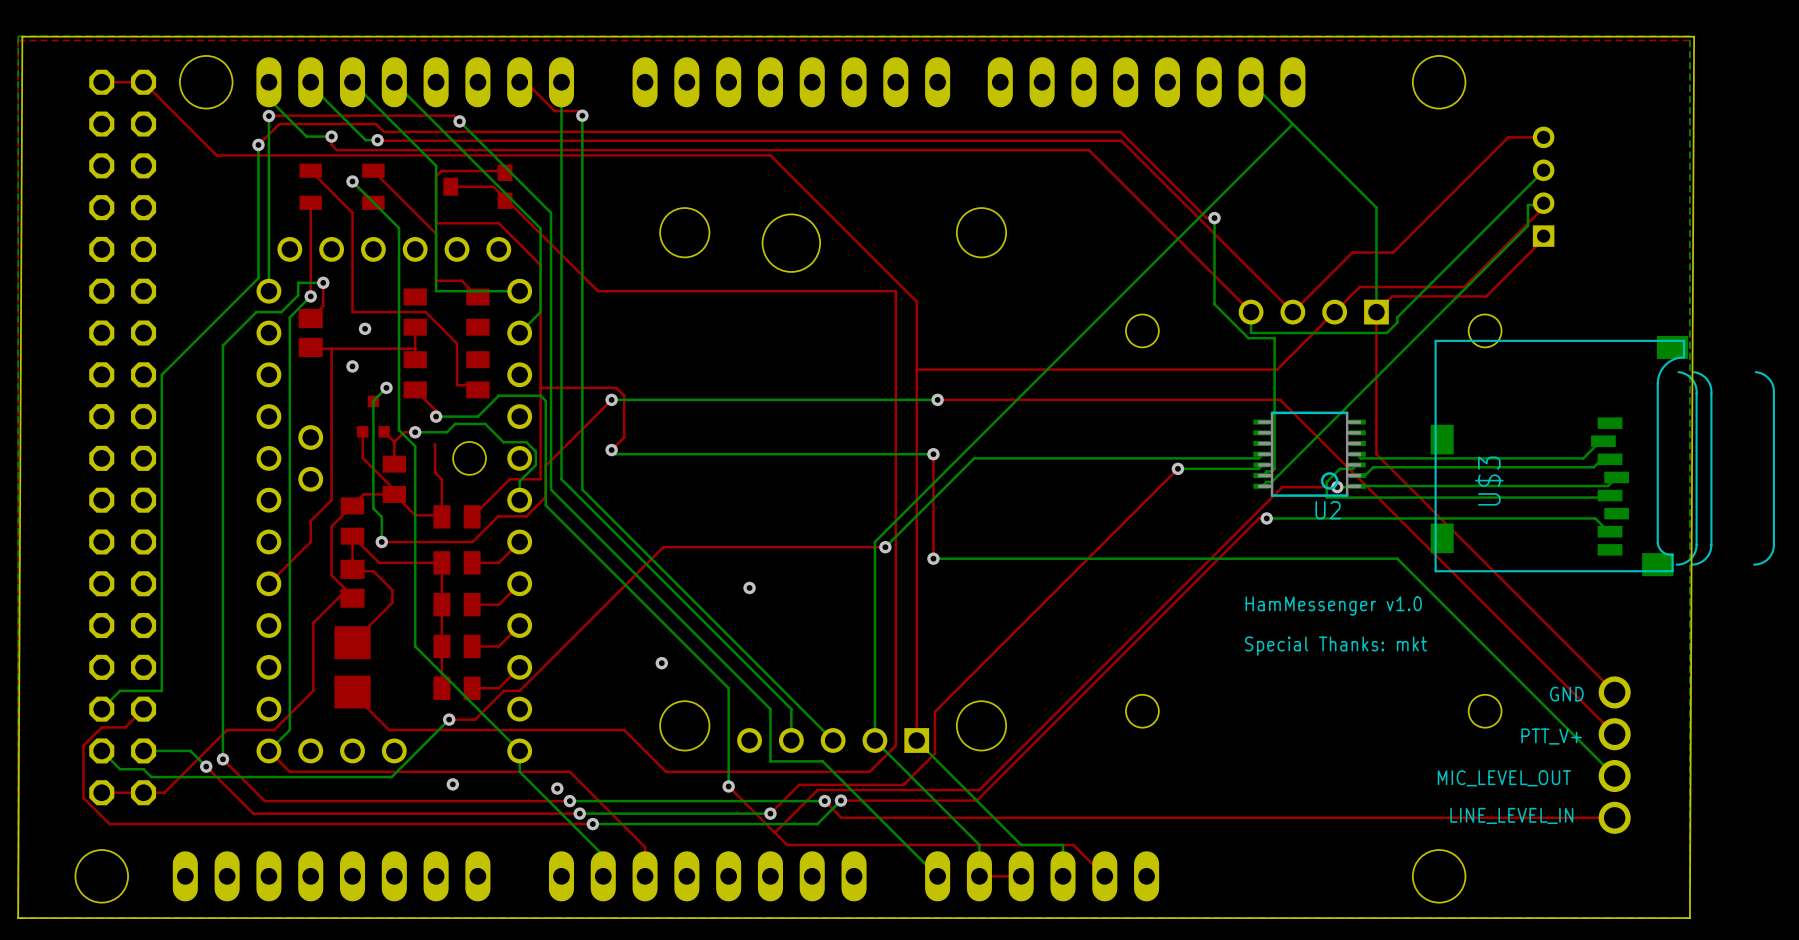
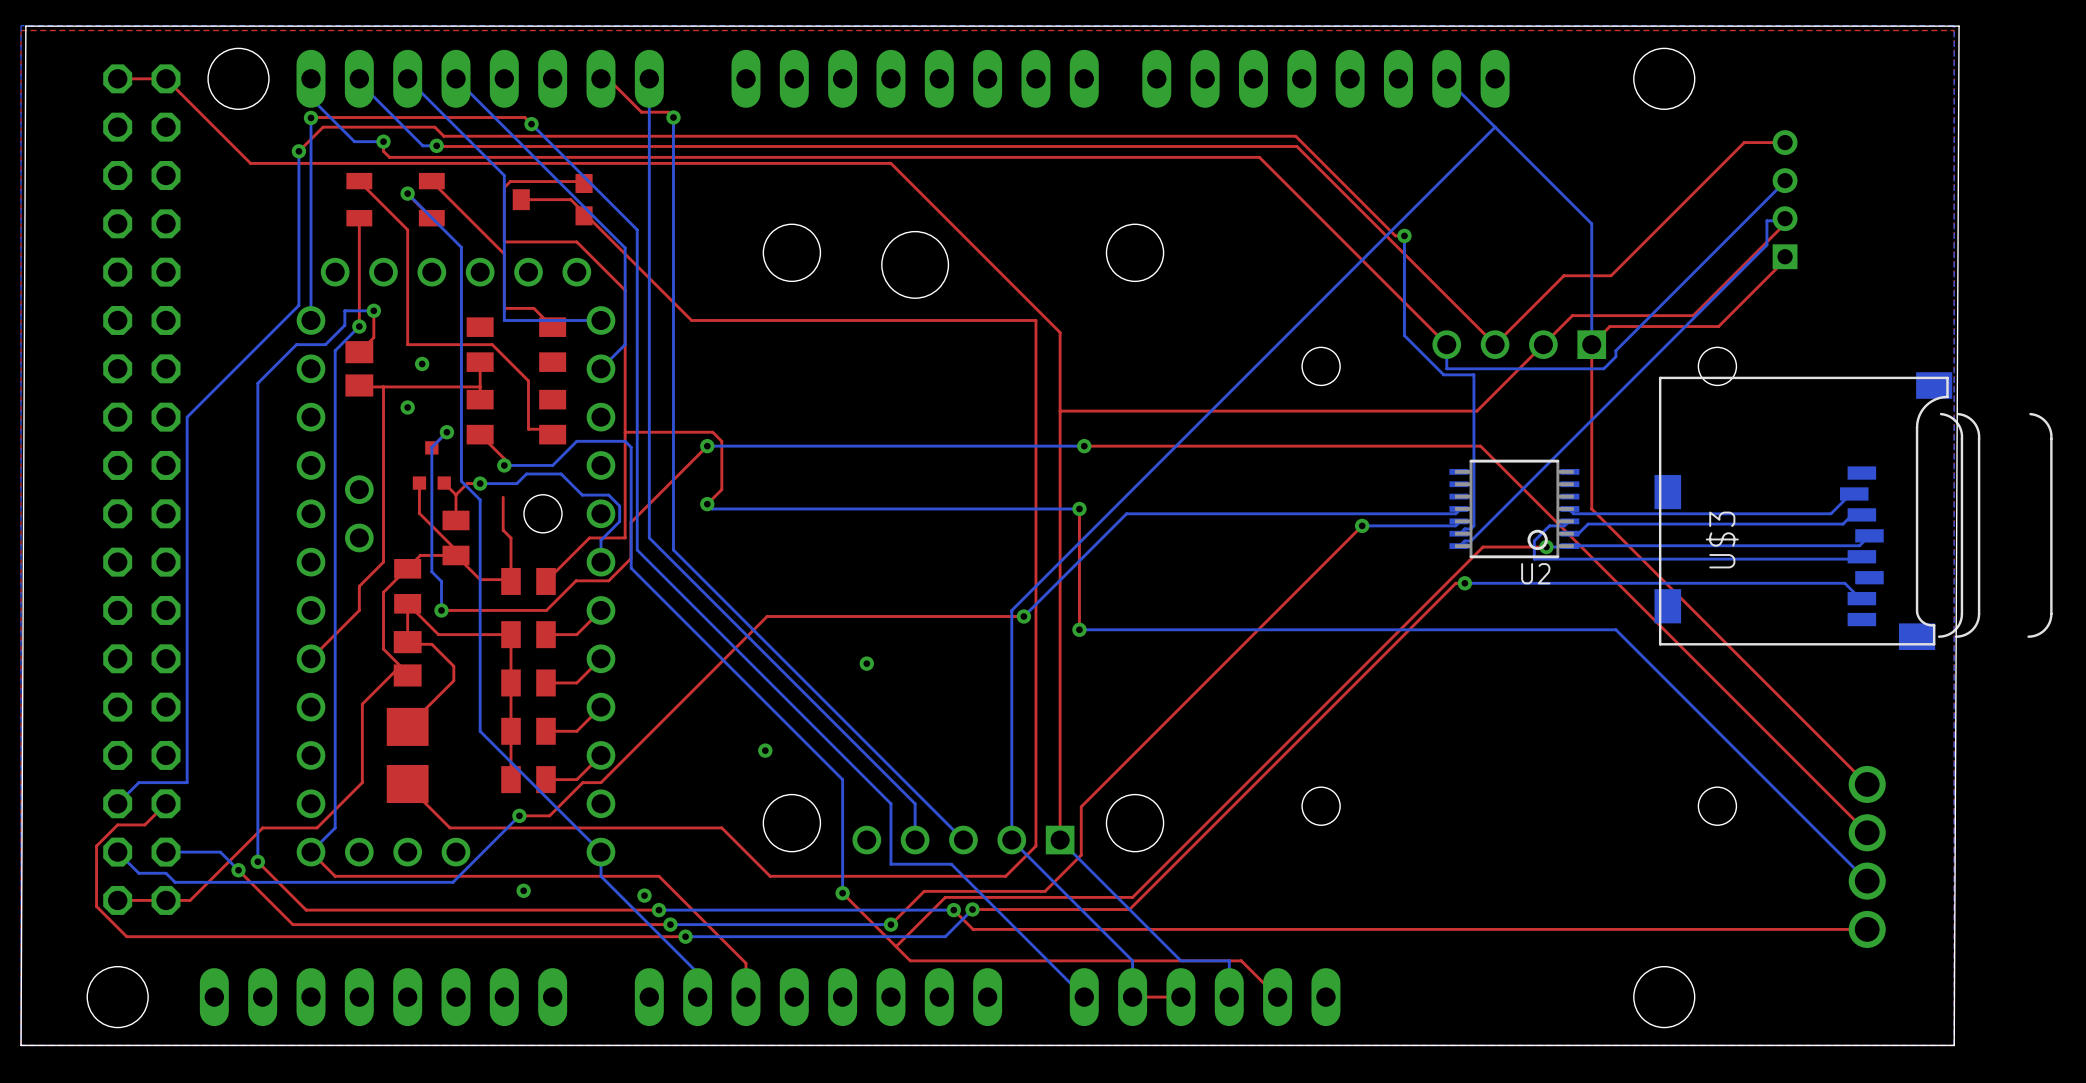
text: HamMessenger v1.0 (1333, 606) -> none
text: Special Thanks: mkt (1335, 646) -> none
text: GND (1566, 694) -> none
text: PTT_V+ (1551, 736) -> none
text: MIC_LEVEL_OUT (1504, 778) -> none
text: LINE_LEVEL_IN (1511, 815) -> none

